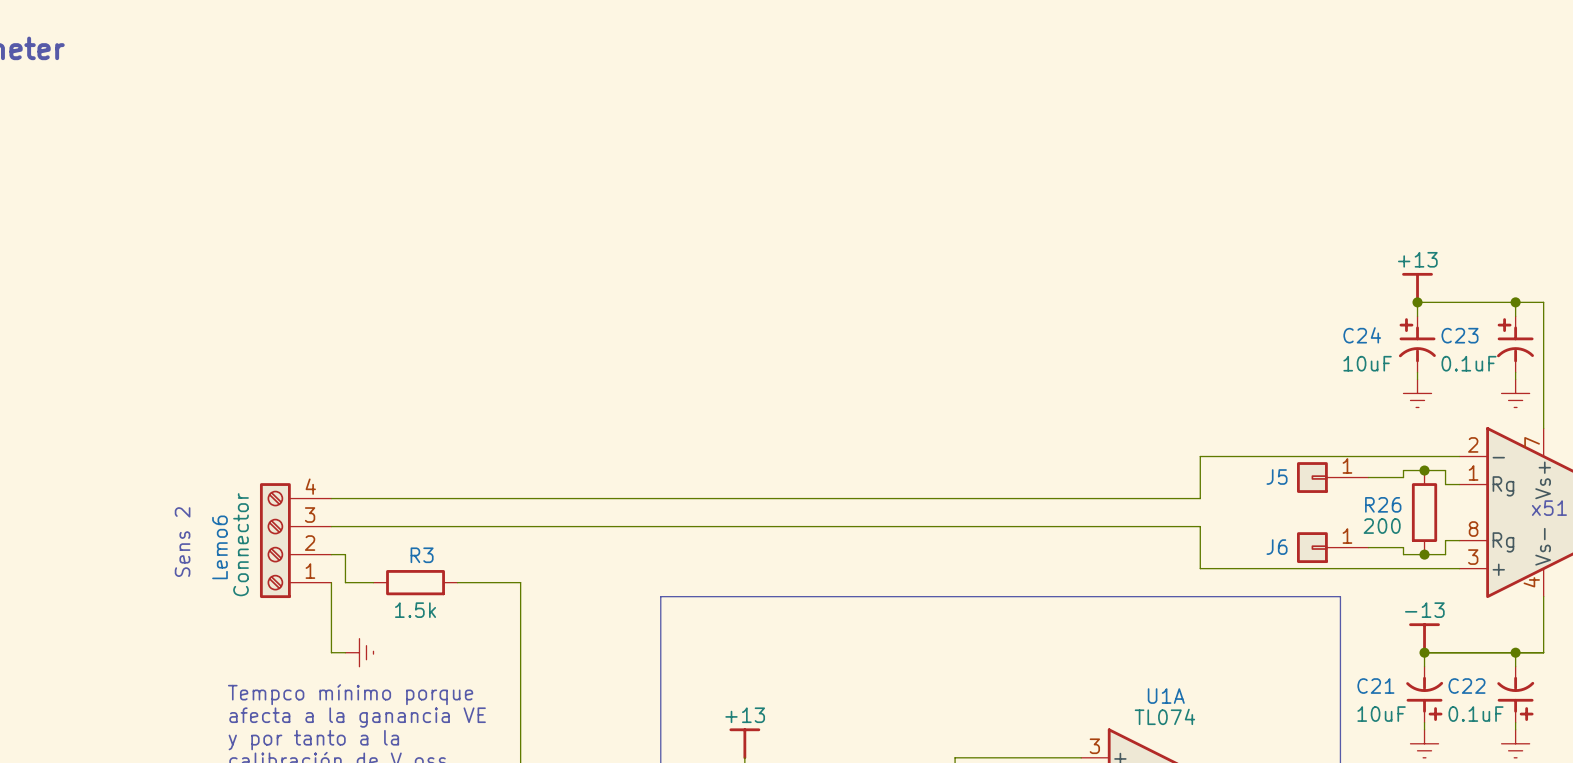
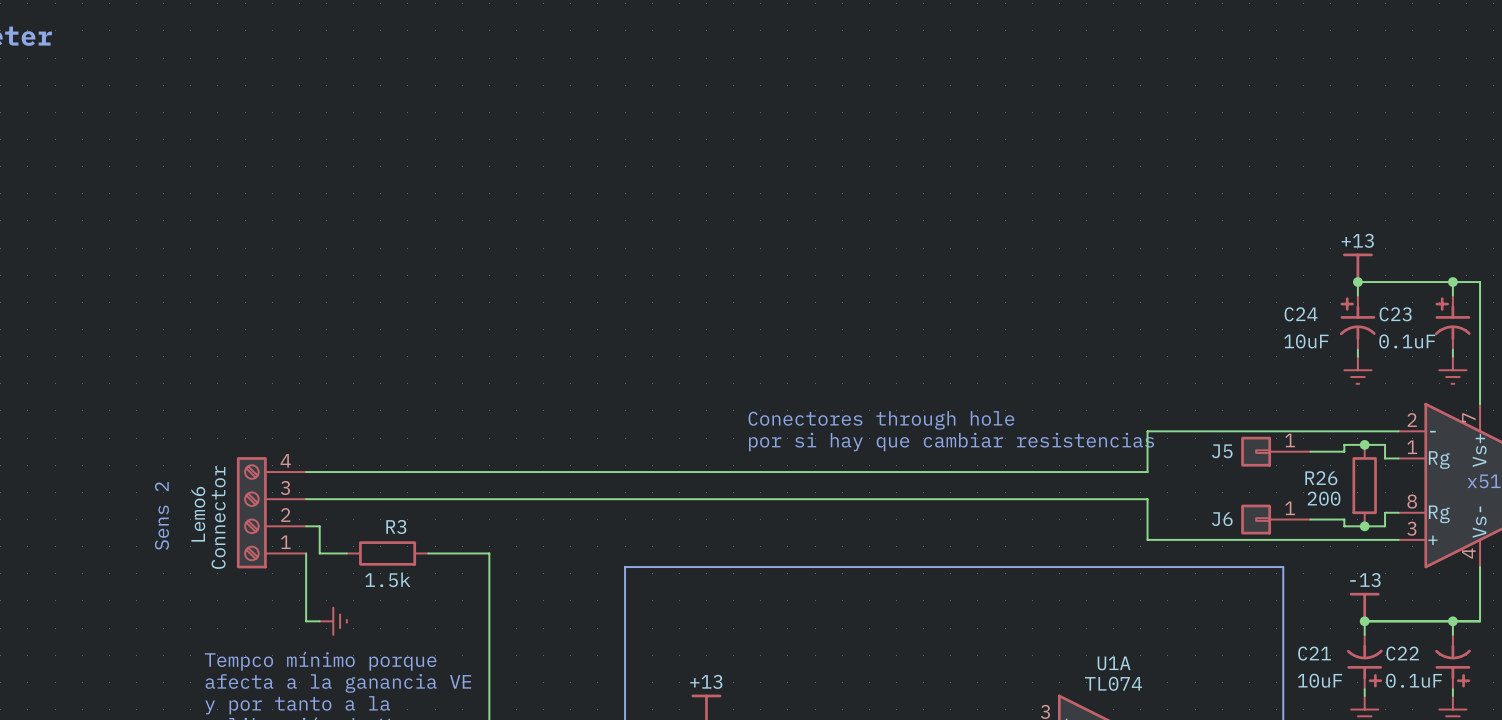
text: none -> Conectores through hole (881, 420)
text: none -> por si hay que cambiar resistencias (951, 442)

